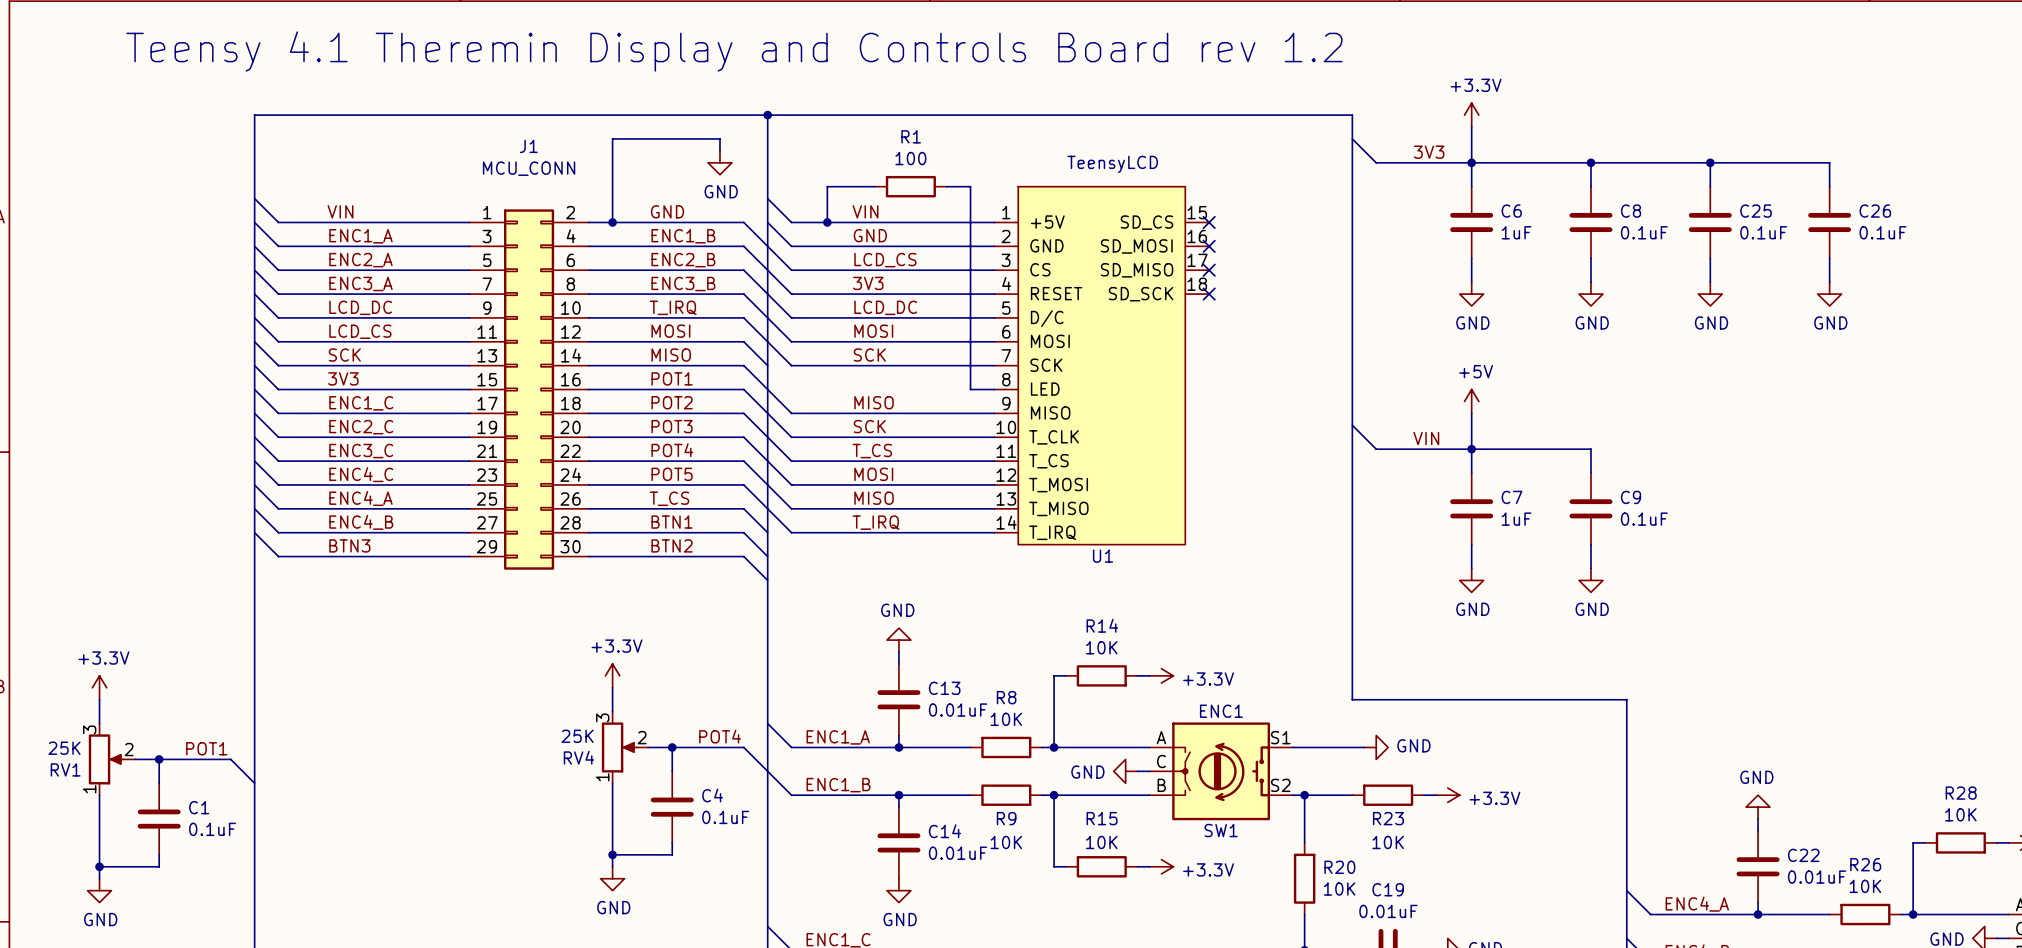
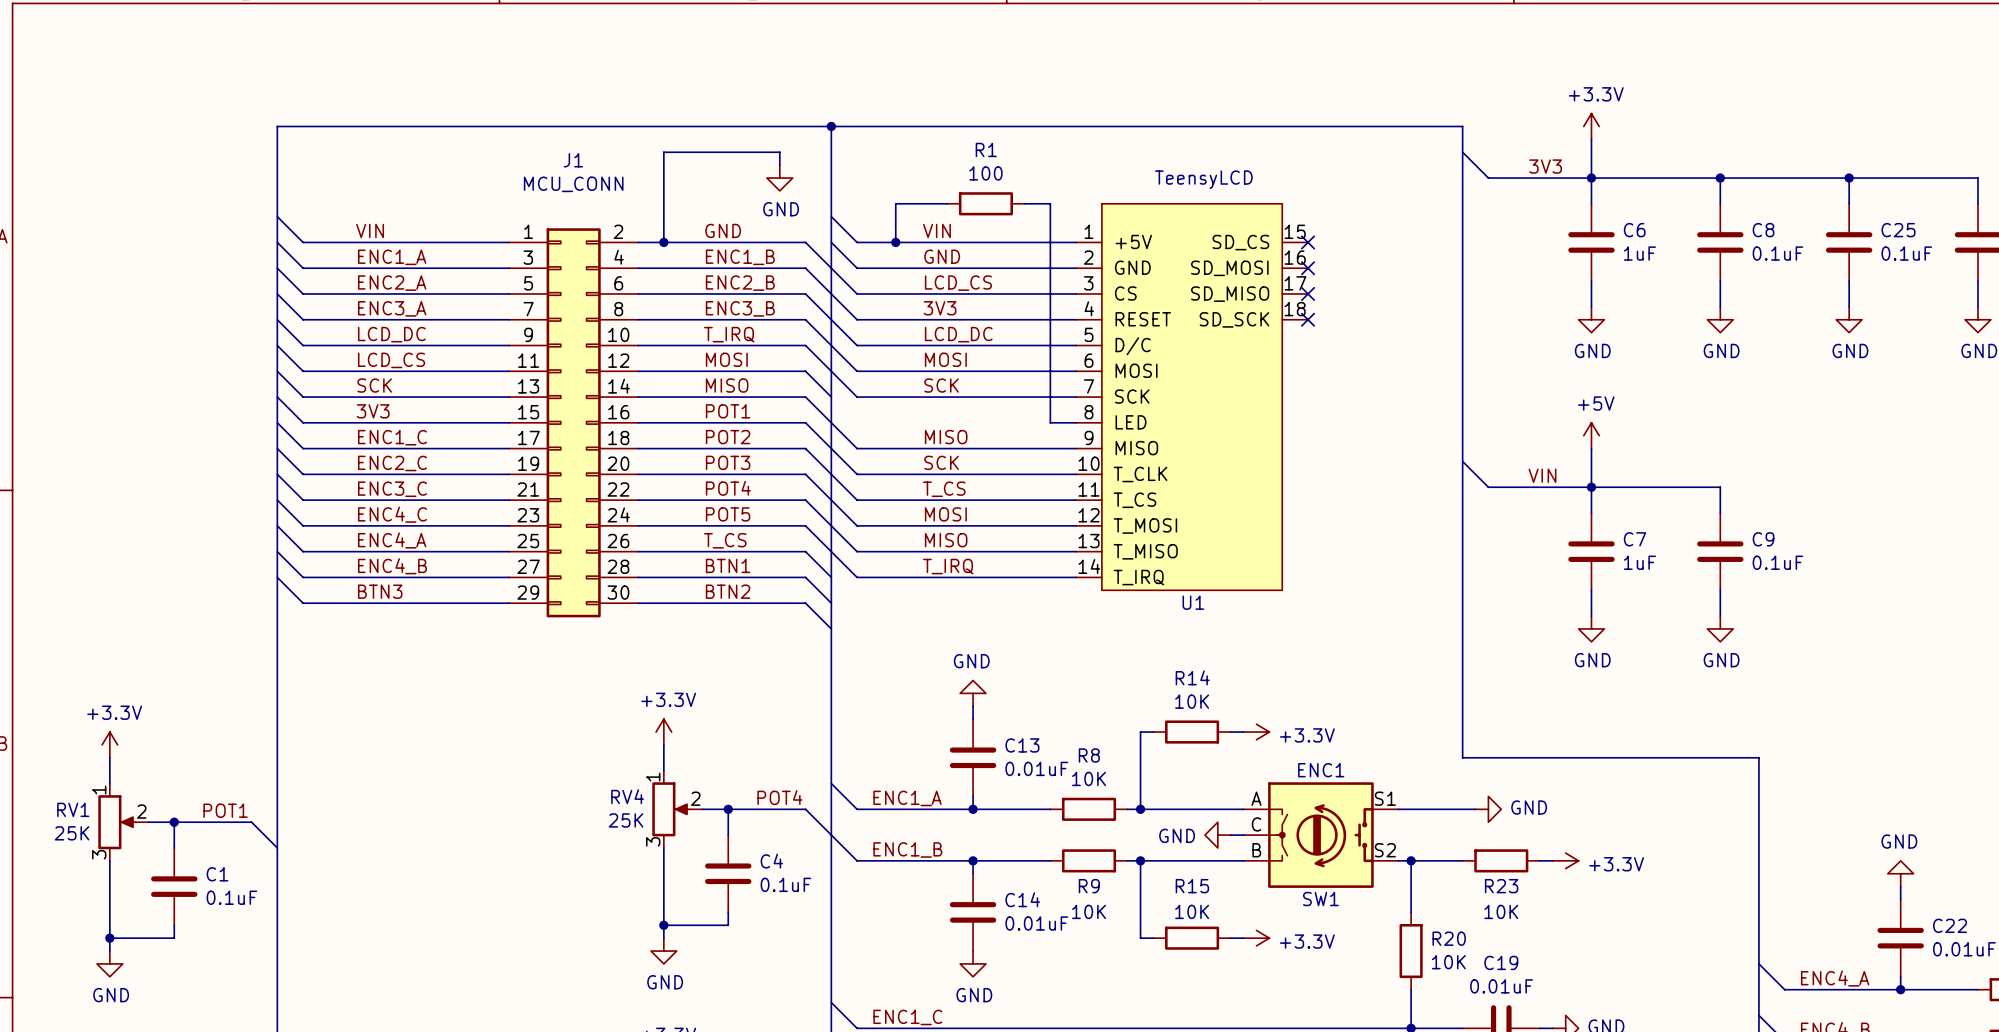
text: Teensy 4.1 Theremin Display and Controls Board rev 1.2 (734, 51) -> none
RV4 flip: as is (619, 747) -> up-down (670, 809)
RV1 flip: as is (106, 759) -> up-down (116, 822)

